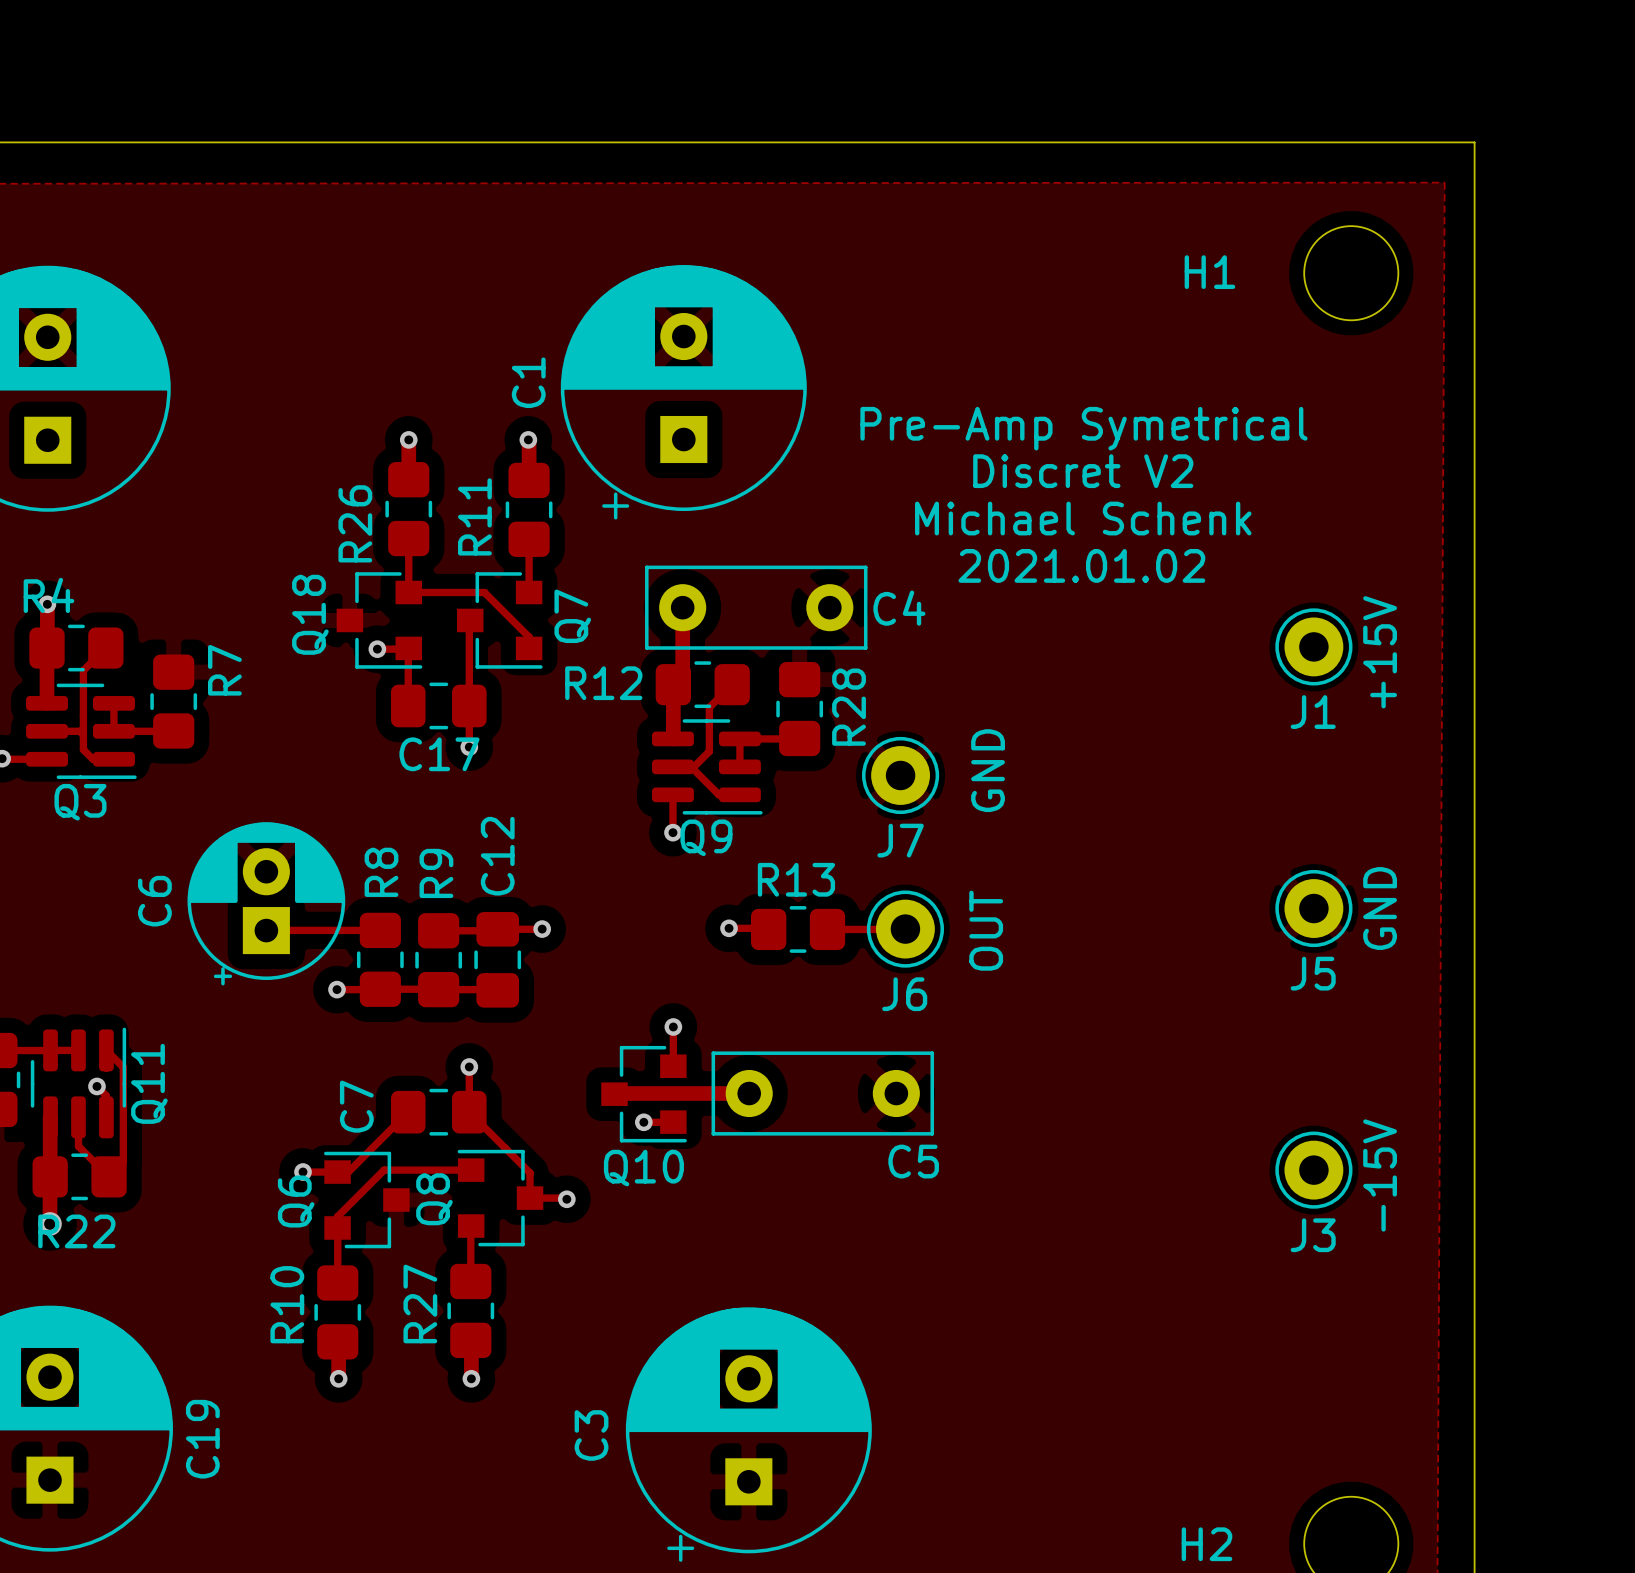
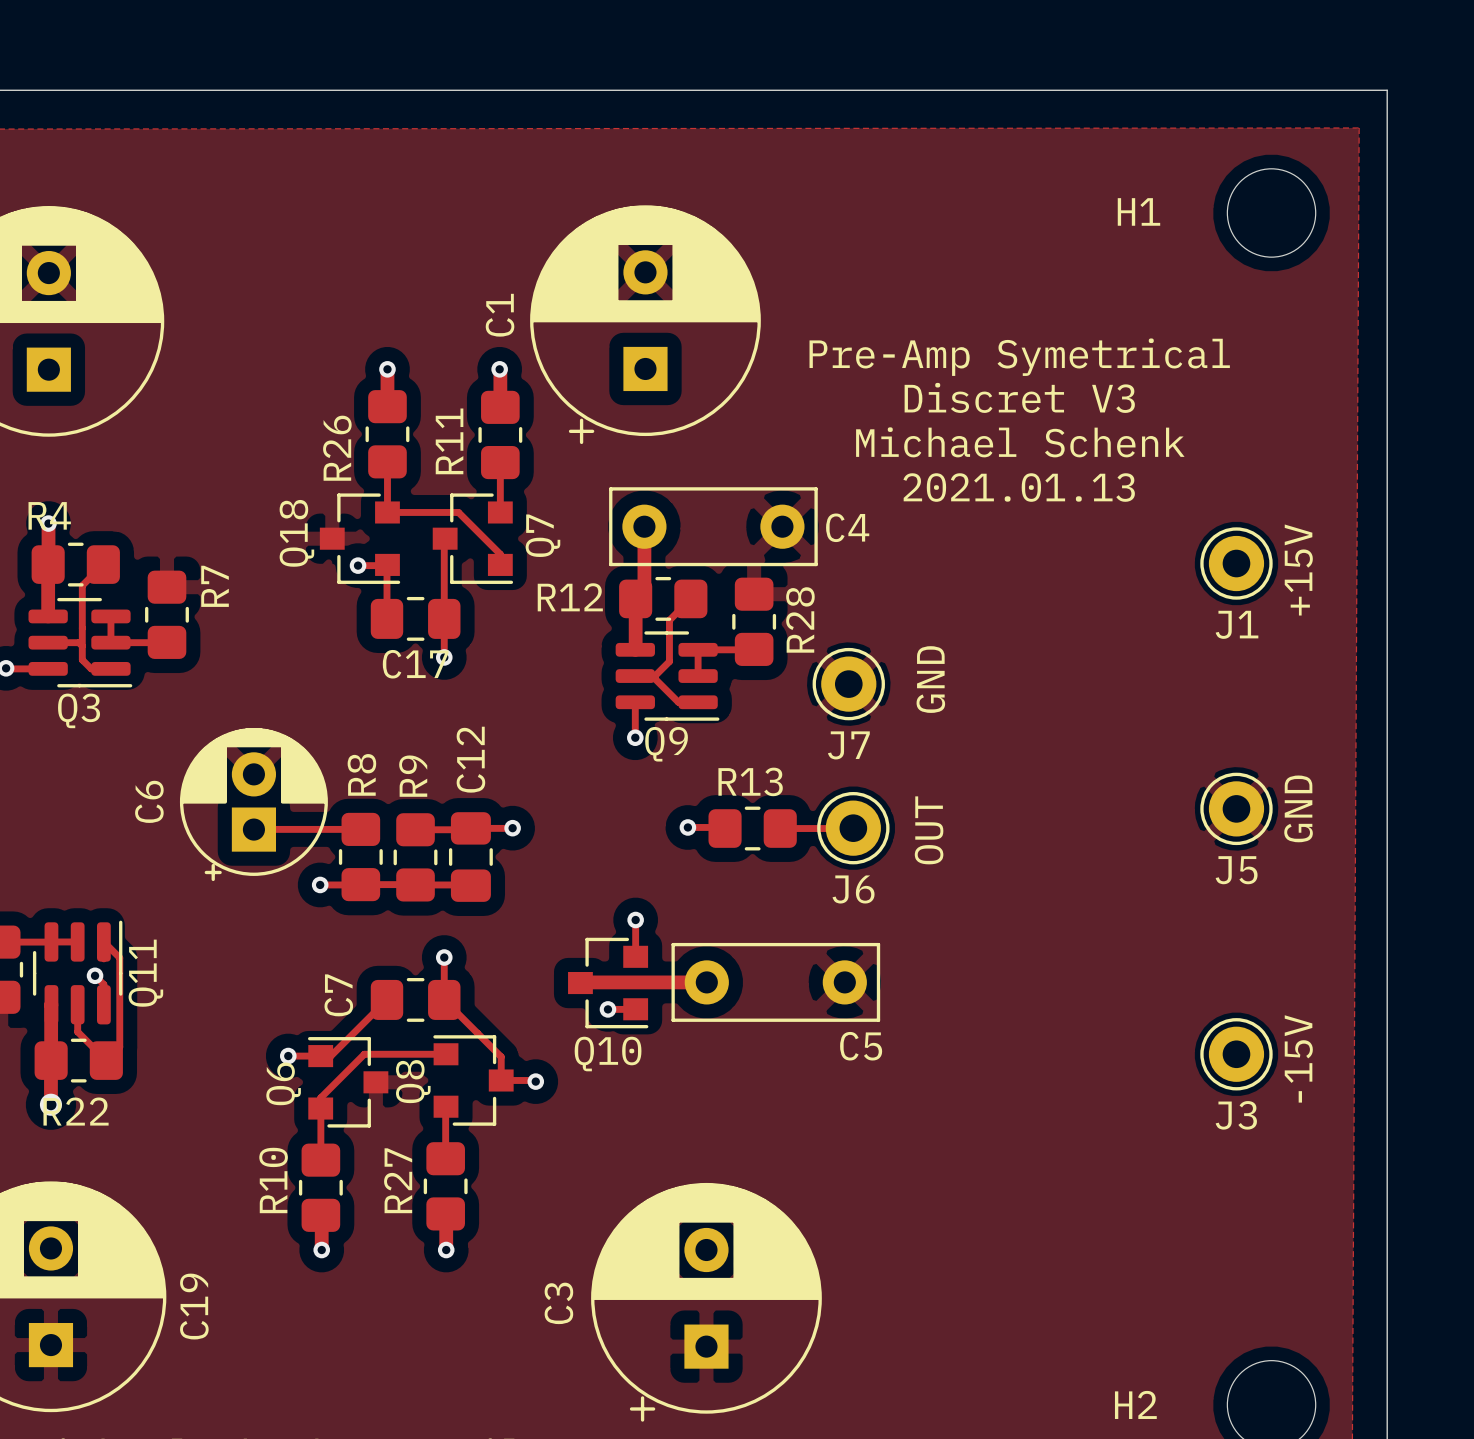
text: Discret V2 (1083, 471) -> Discret V3 (1019, 397)
text: 2021.01.02 (1081, 565) -> 2021.01.13 (1019, 487)

